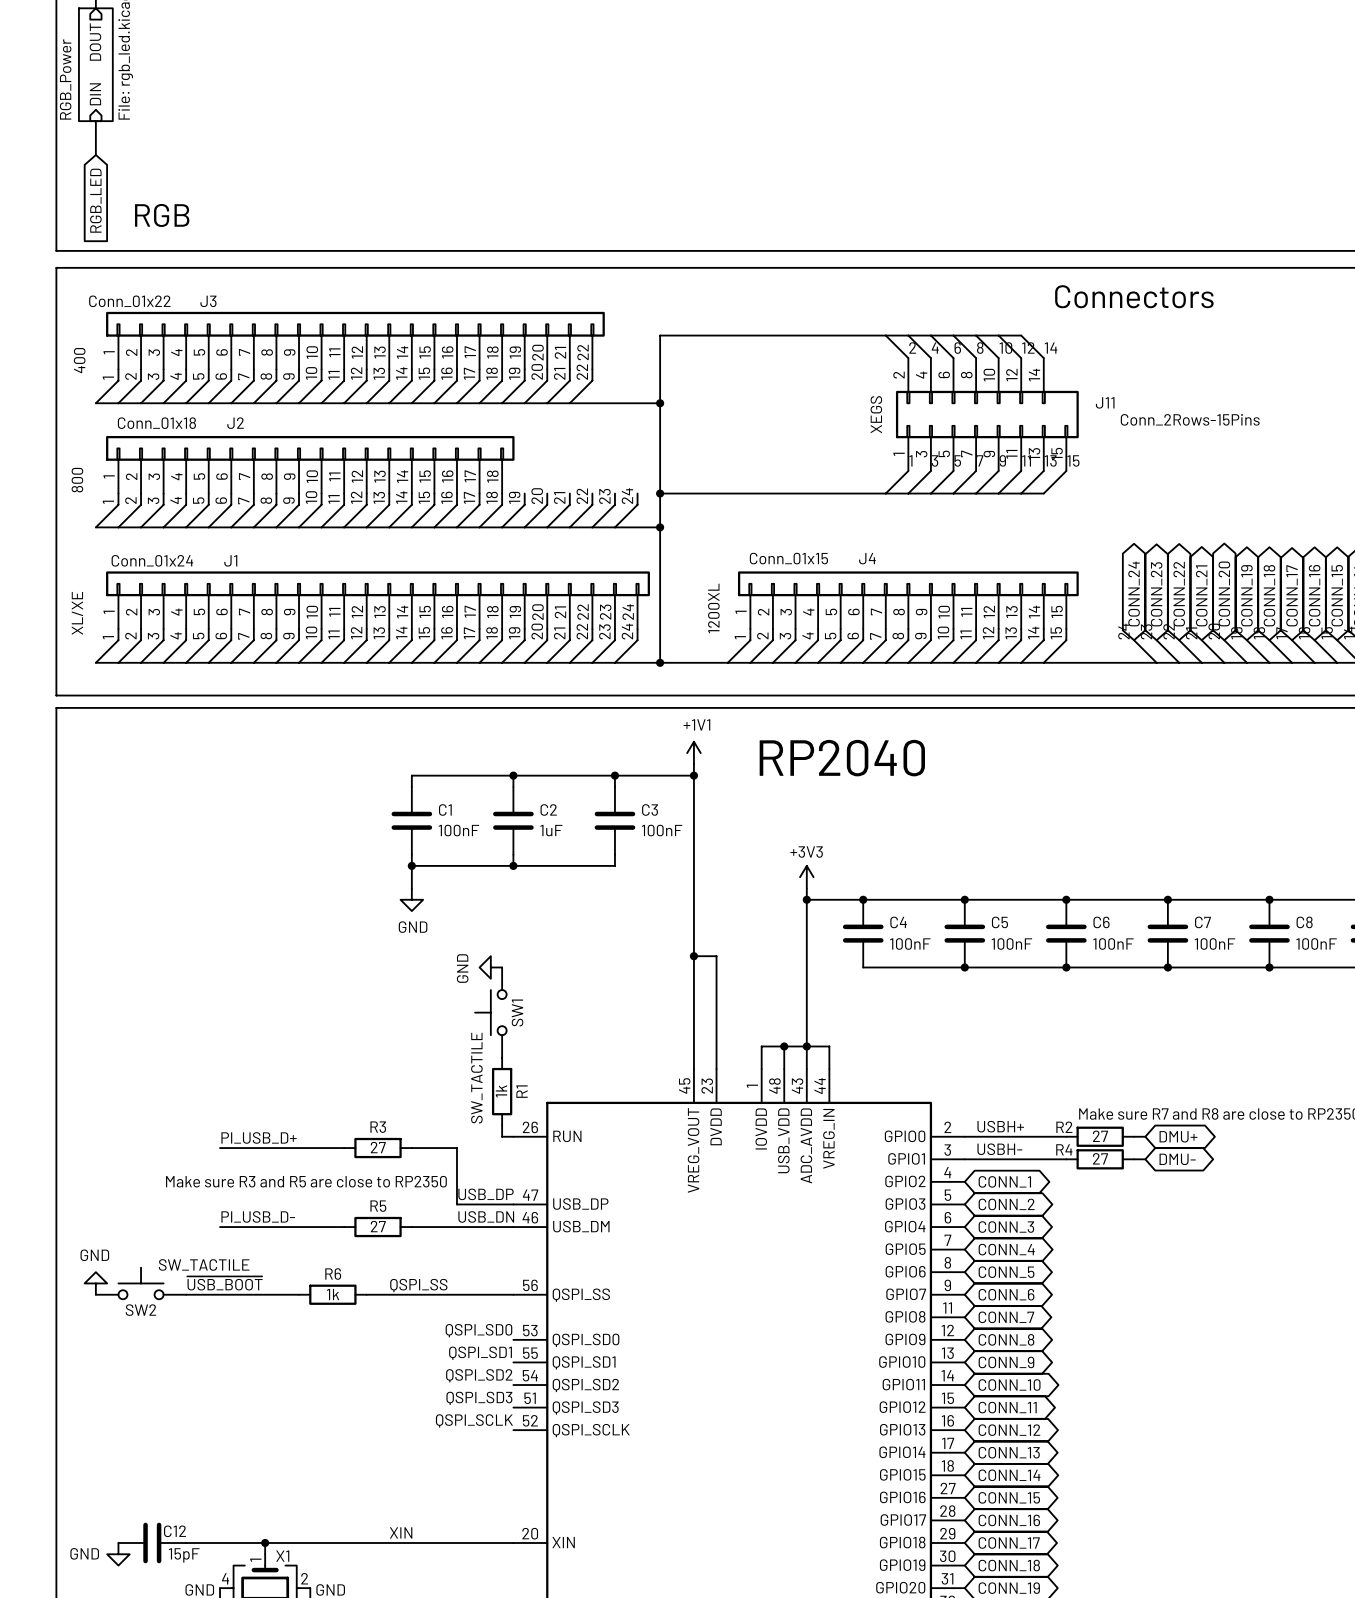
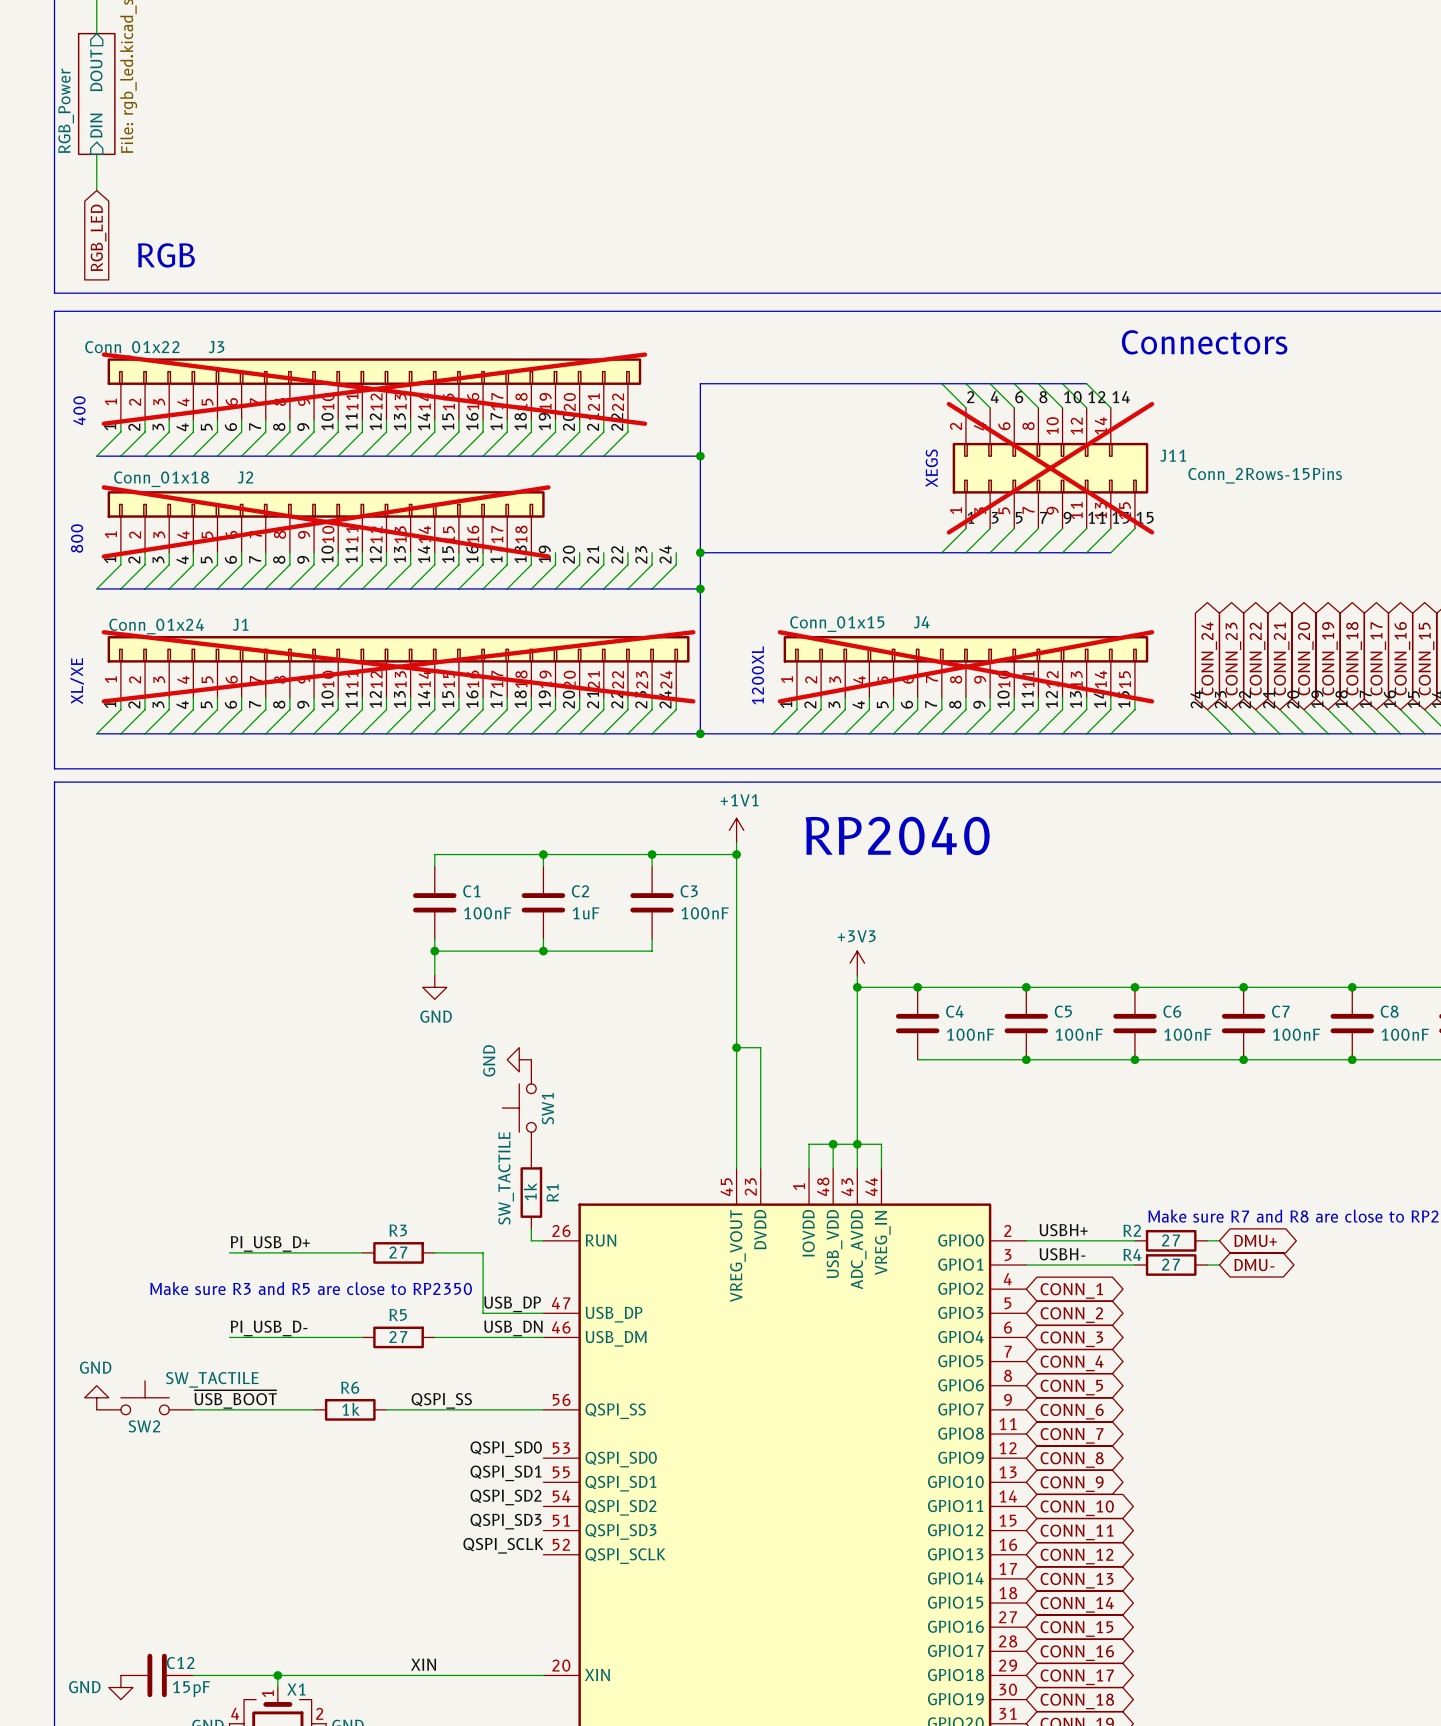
J3 do-not-place cross: none -> (374, 389)
J11 do-not-place cross: none -> (1050, 468)
J2 do-not-place cross: none -> (326, 521)
J1 do-not-place cross: none -> (398, 666)
J4 do-not-place cross: none -> (965, 666)

